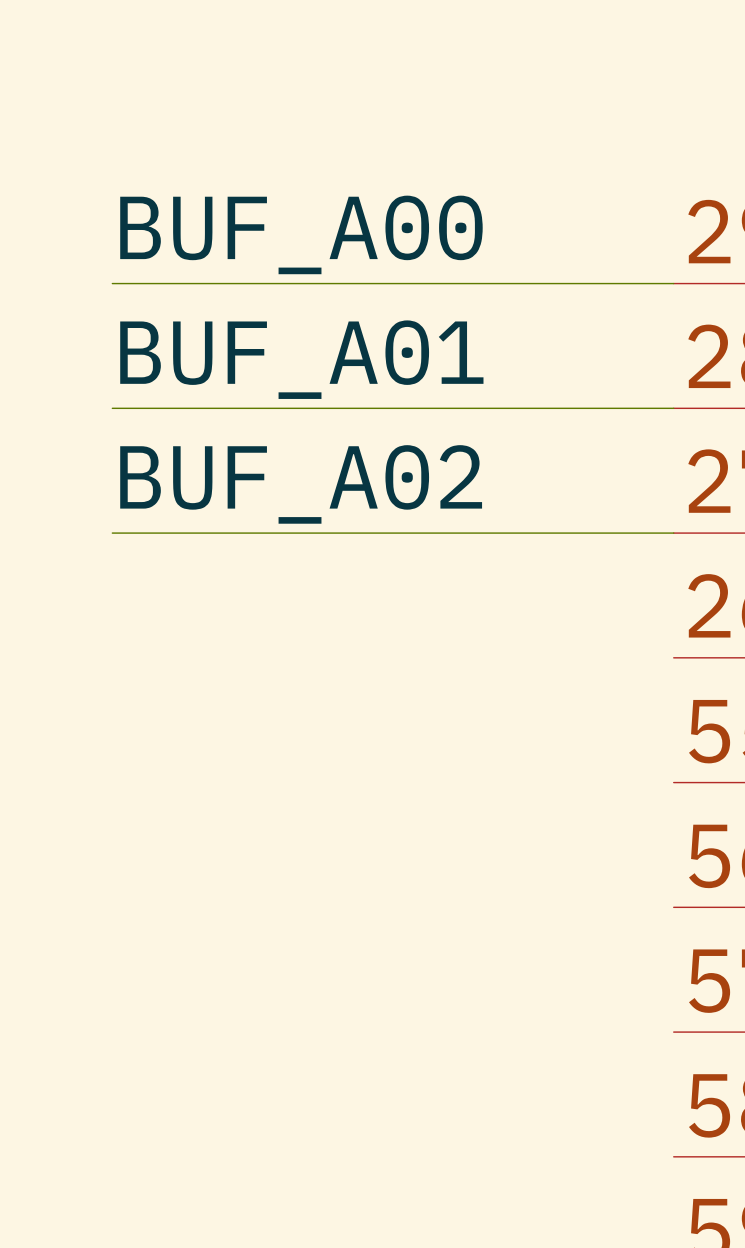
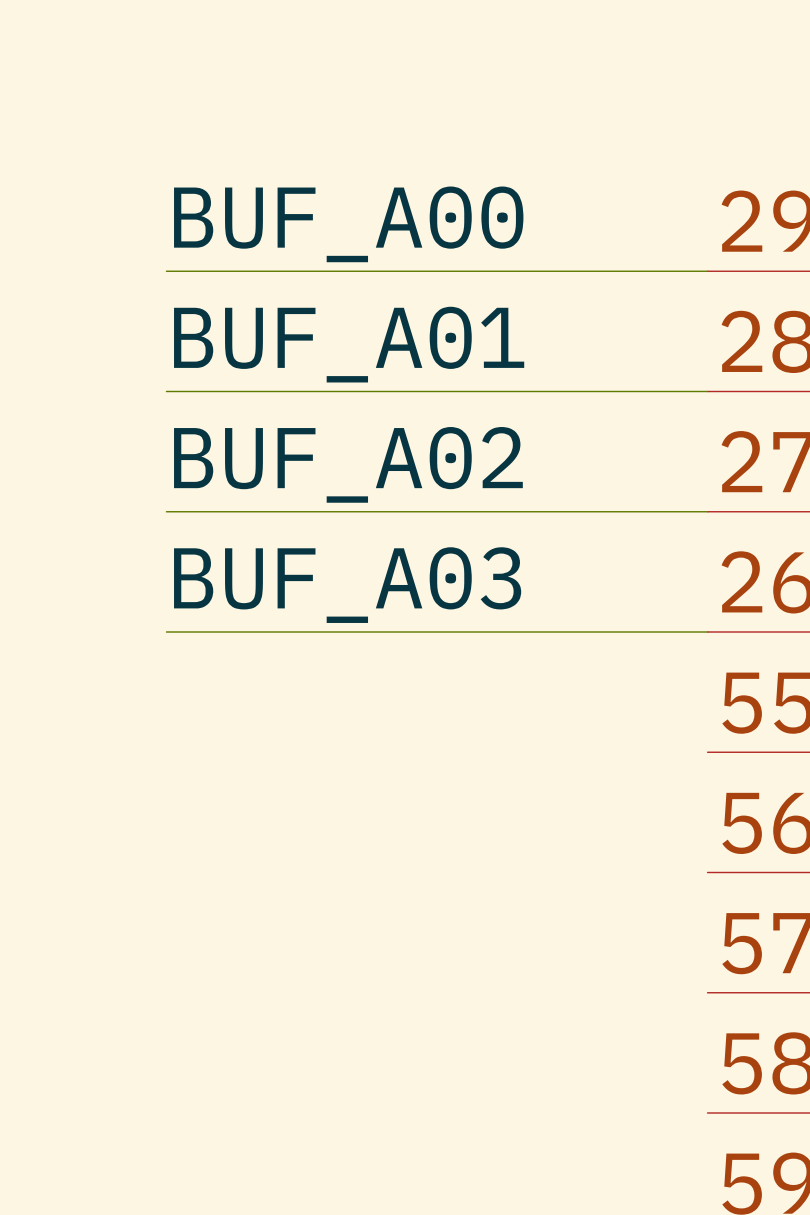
label: none -> BUF_A03 (347, 585)
wire: none -> (166, 632) (707, 632)

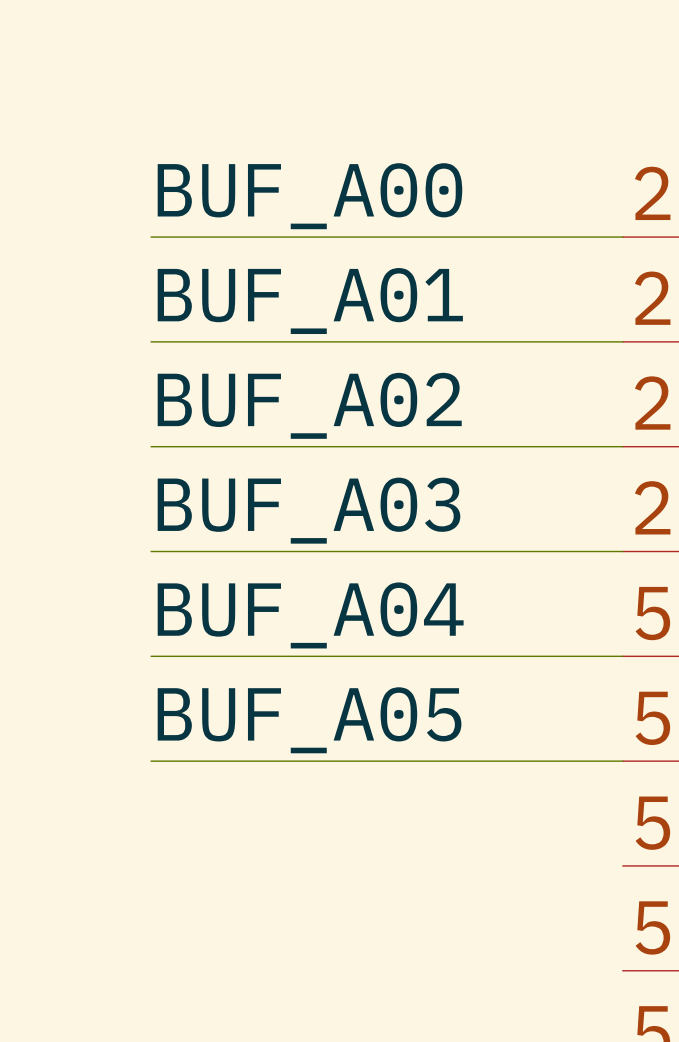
label: none -> BUF_A04 (310, 615)
wire: none -> (151, 656) (622, 656)
label: none -> BUF_A05 (309, 720)
wire: none -> (151, 761) (622, 761)

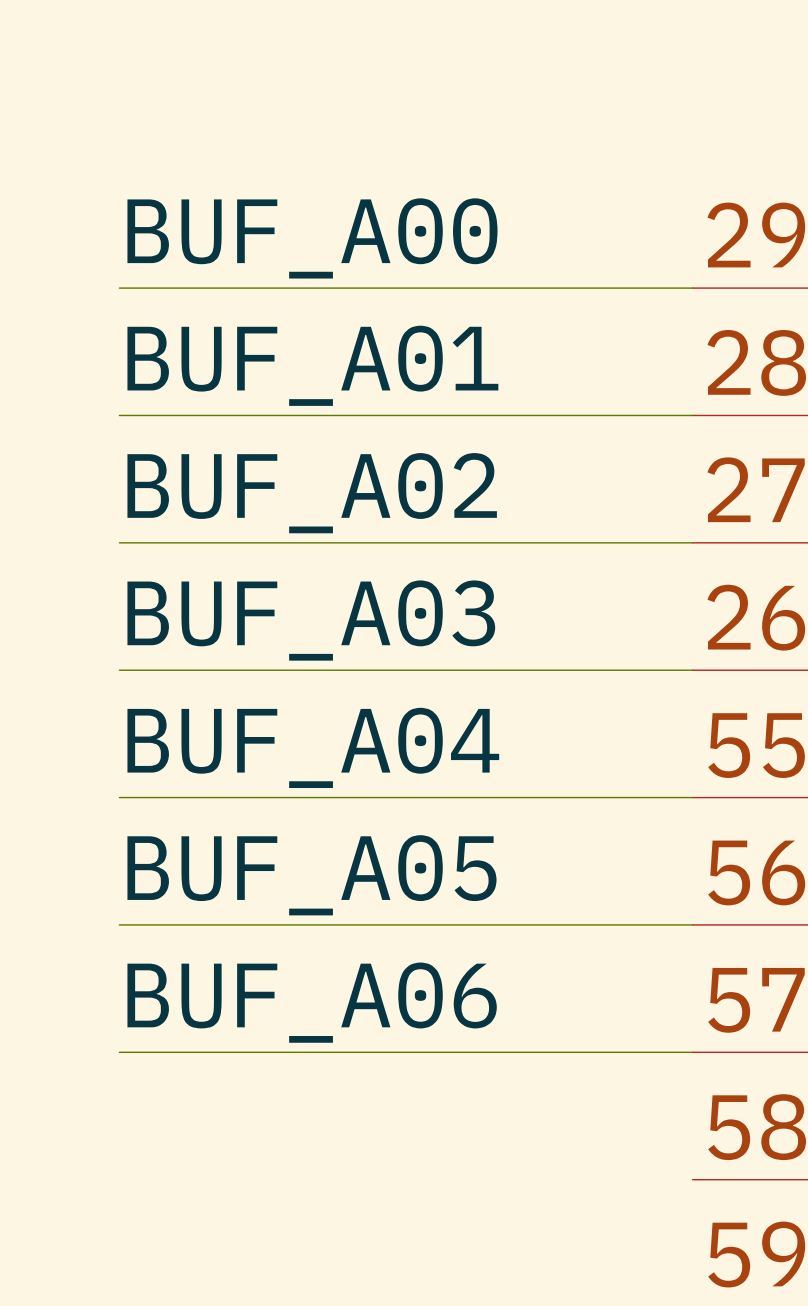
label: none -> BUF_A06 (312, 1002)
wire: none -> (119, 1052) (692, 1052)

